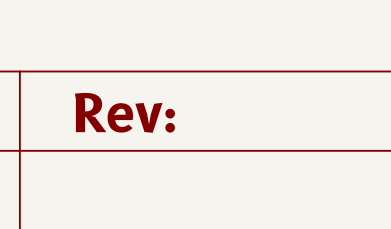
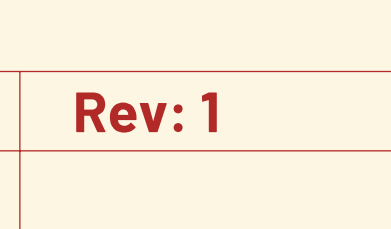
title block: Rev: (124, 112) -> Rev: 1 (146, 112)

